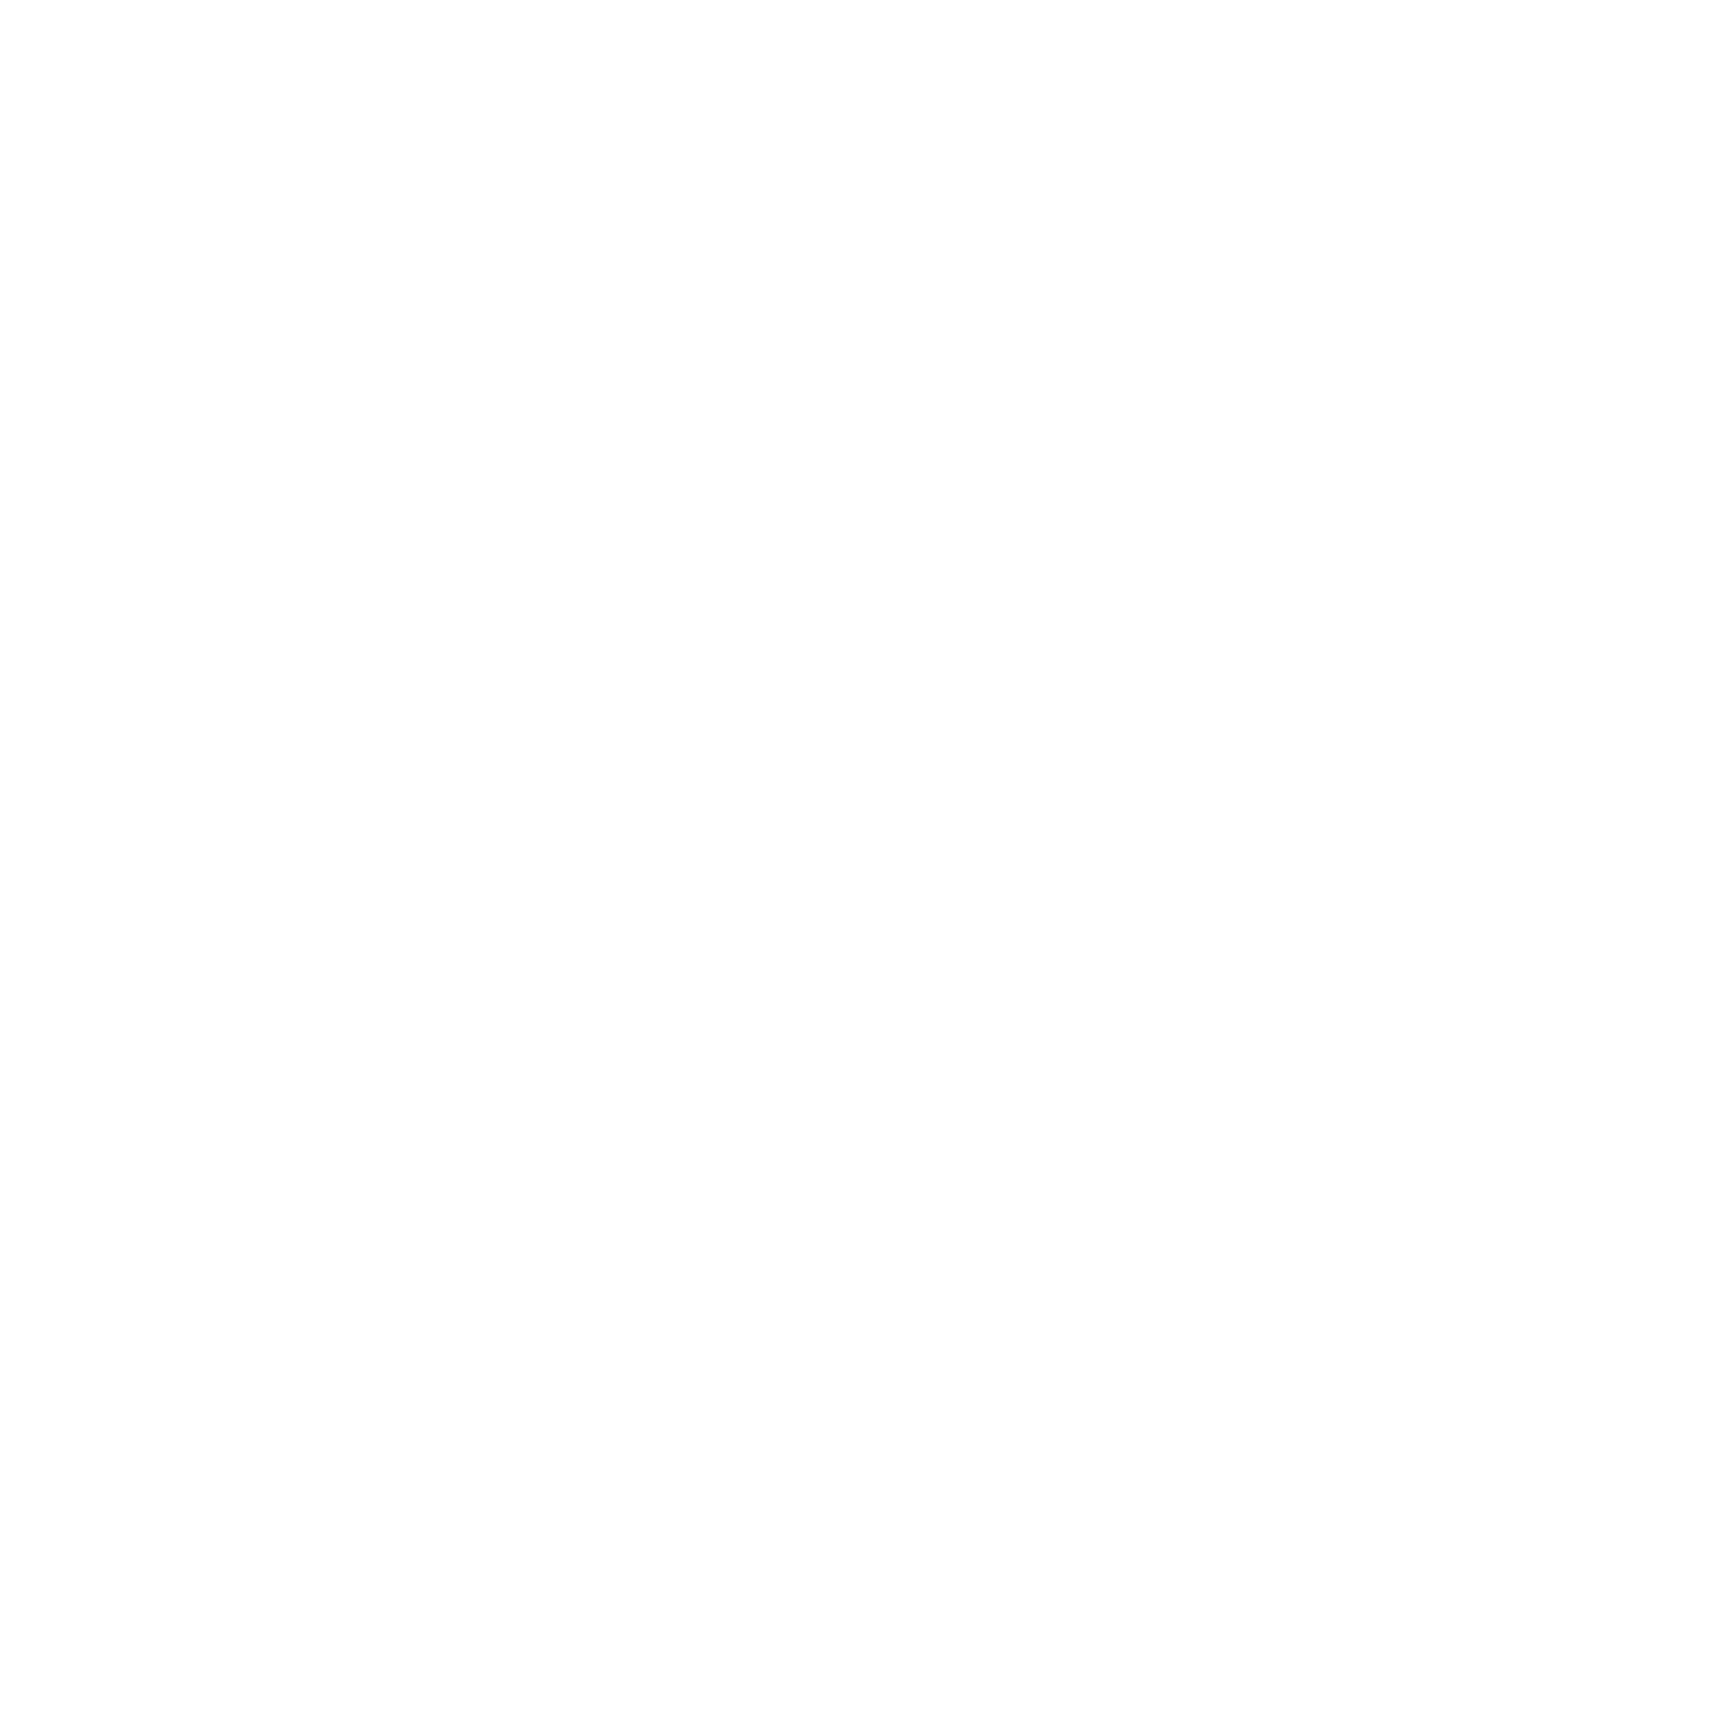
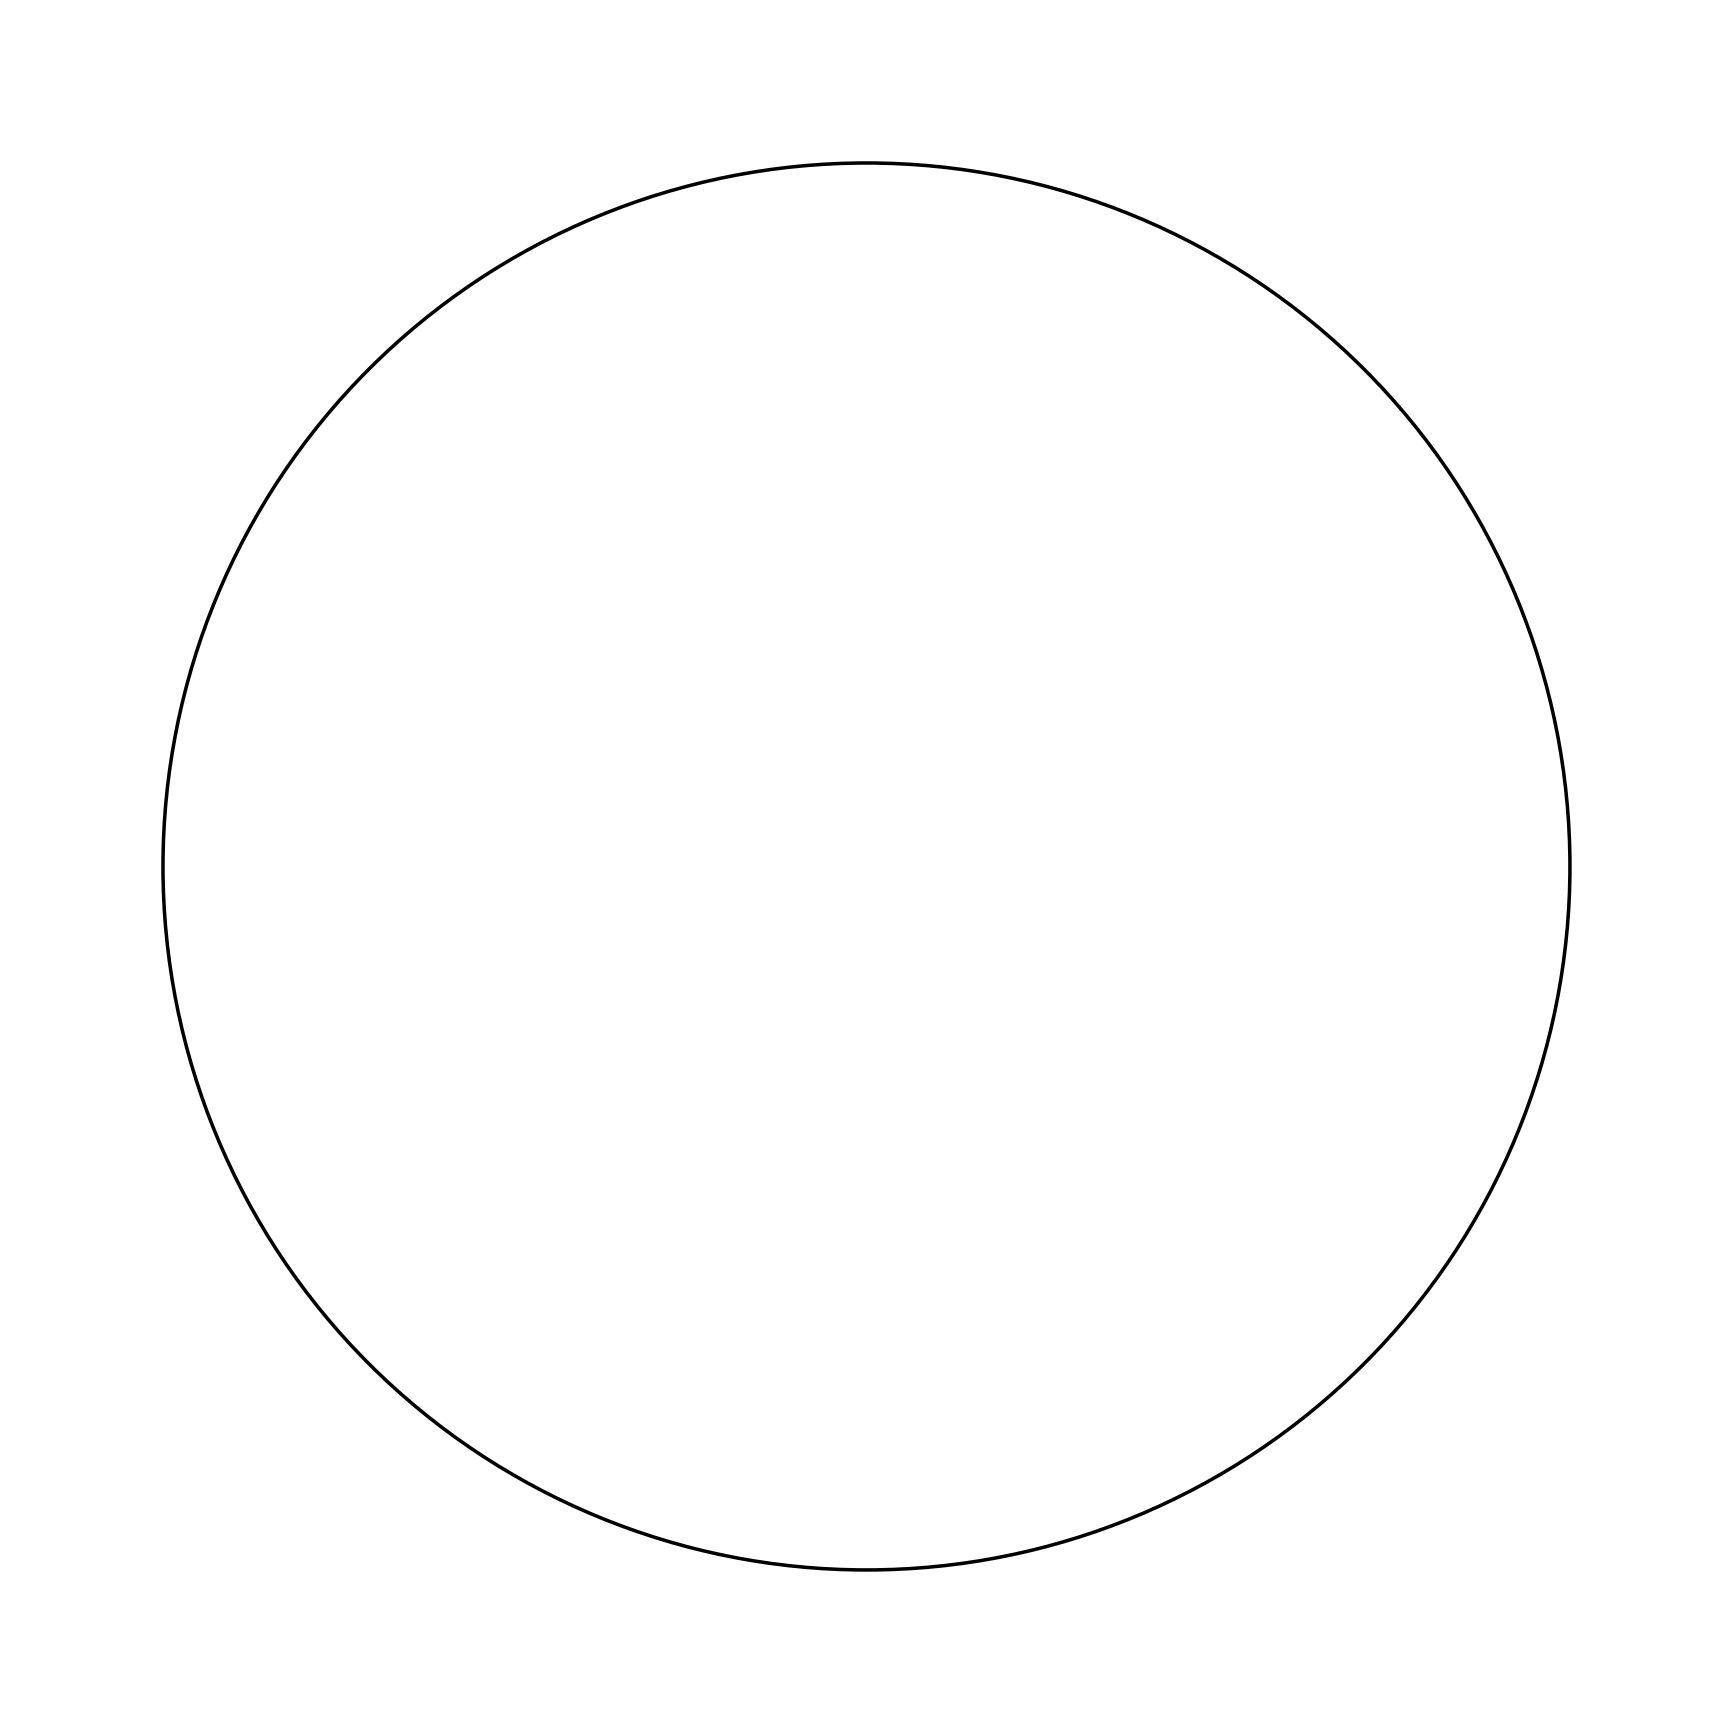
round board edge: none -> [161, 161, 1572, 1572]

